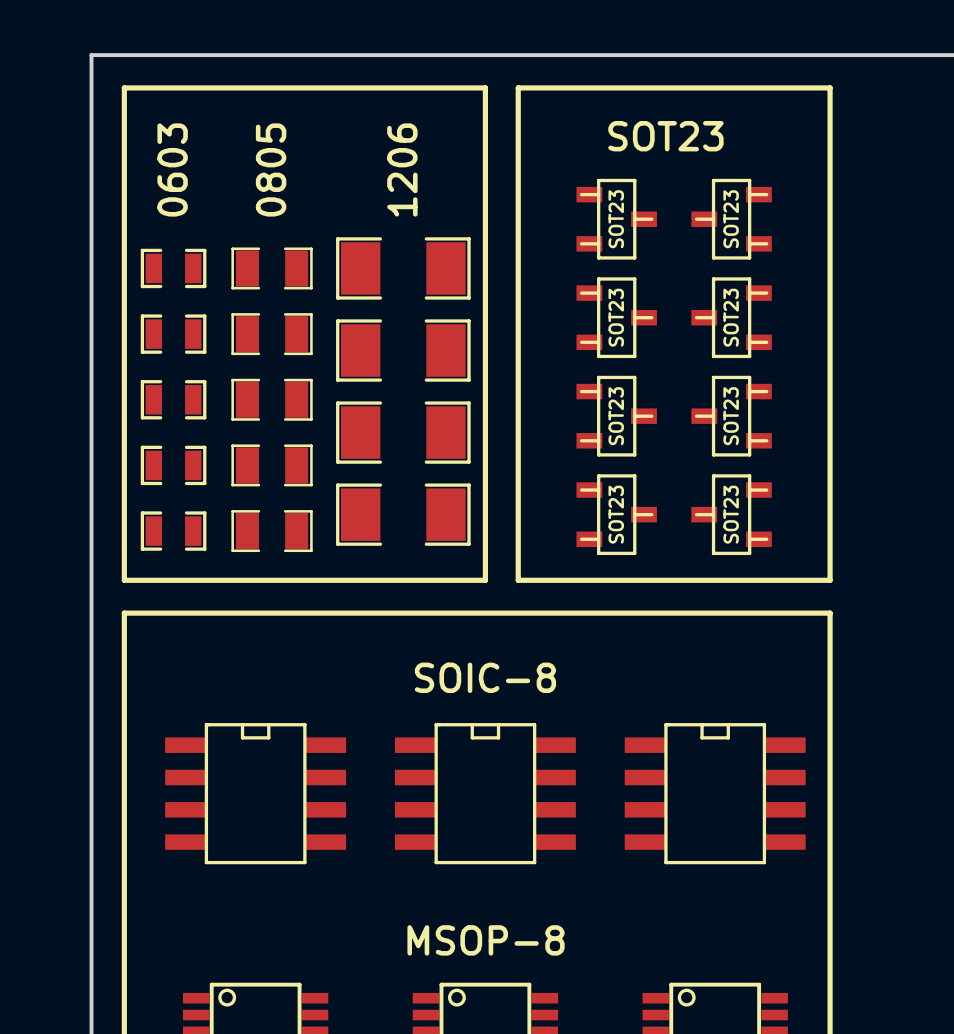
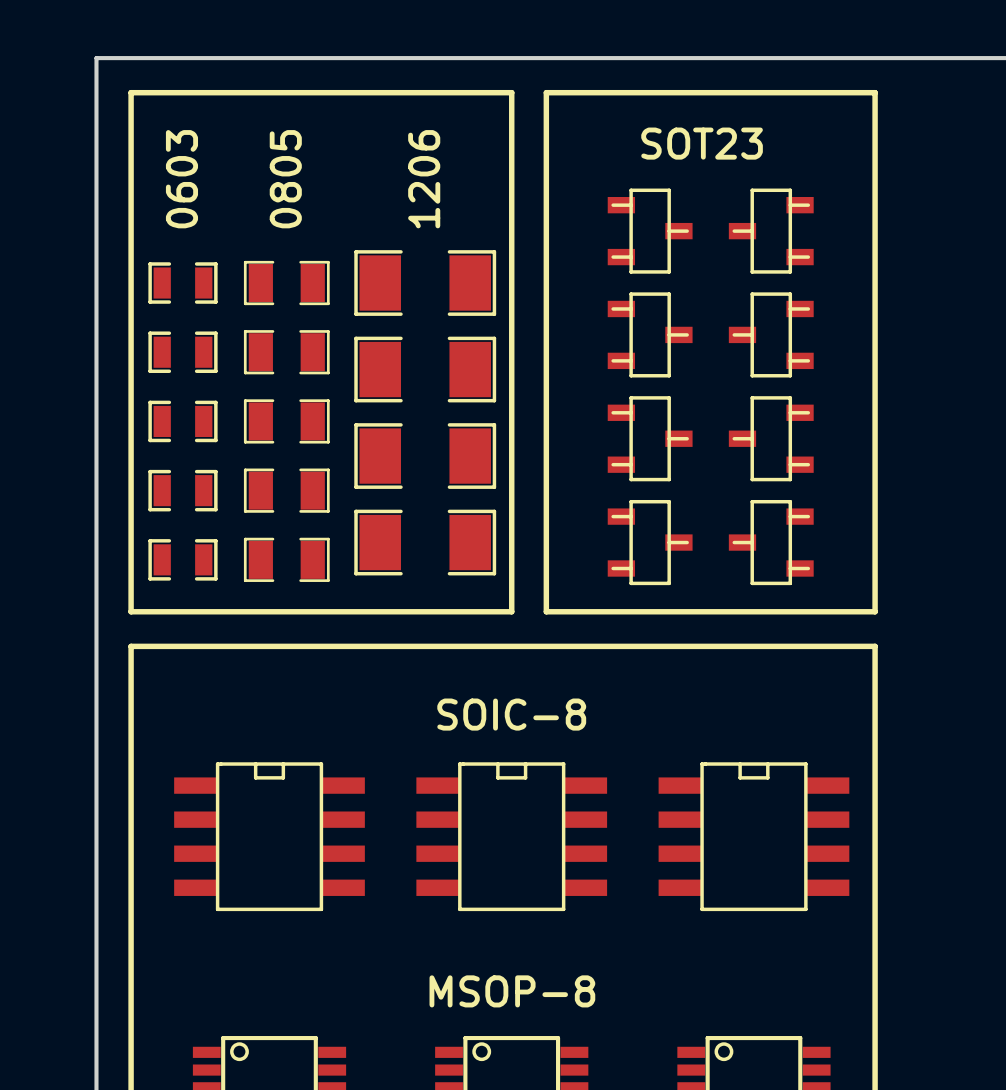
SOT23 name: SOT23 (616, 219) -> none
SOT23 name: SOT23 (731, 219) -> none
SOT23 name: SOT23 (616, 317) -> none
SOT23 name: SOT23 (731, 317) -> none
SOT23 name: SOT23 (616, 416) -> none
SOT23 name: SOT23 (731, 416) -> none
SOT23 name: SOT23 (616, 514) -> none
SOT23 name: SOT23 (731, 514) -> none

